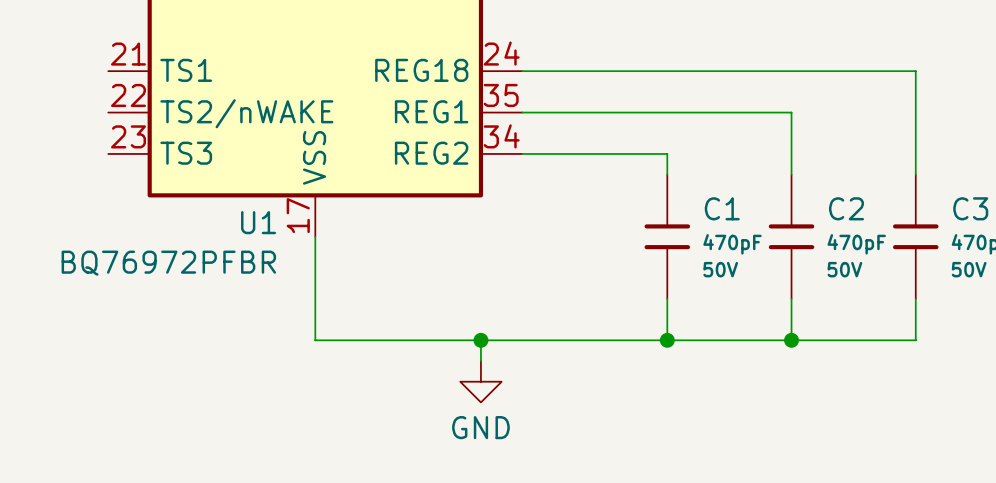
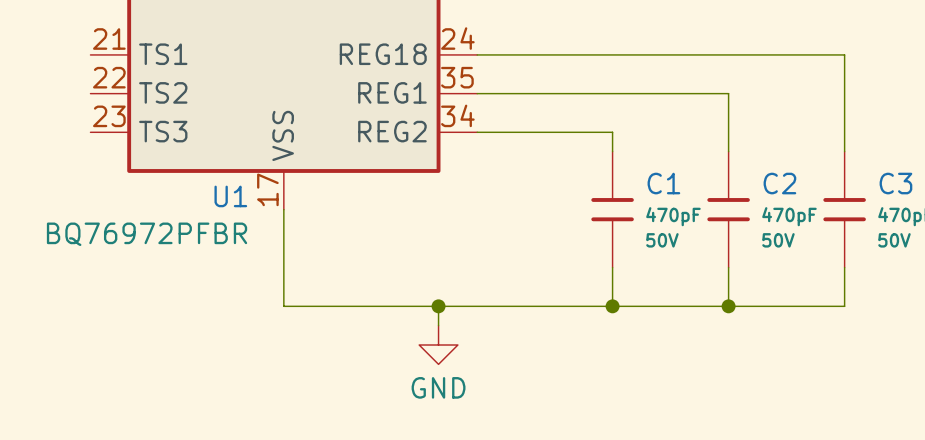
U1 pin name: TS2/nWAKE (246, 113) -> TS2 (163, 92)

